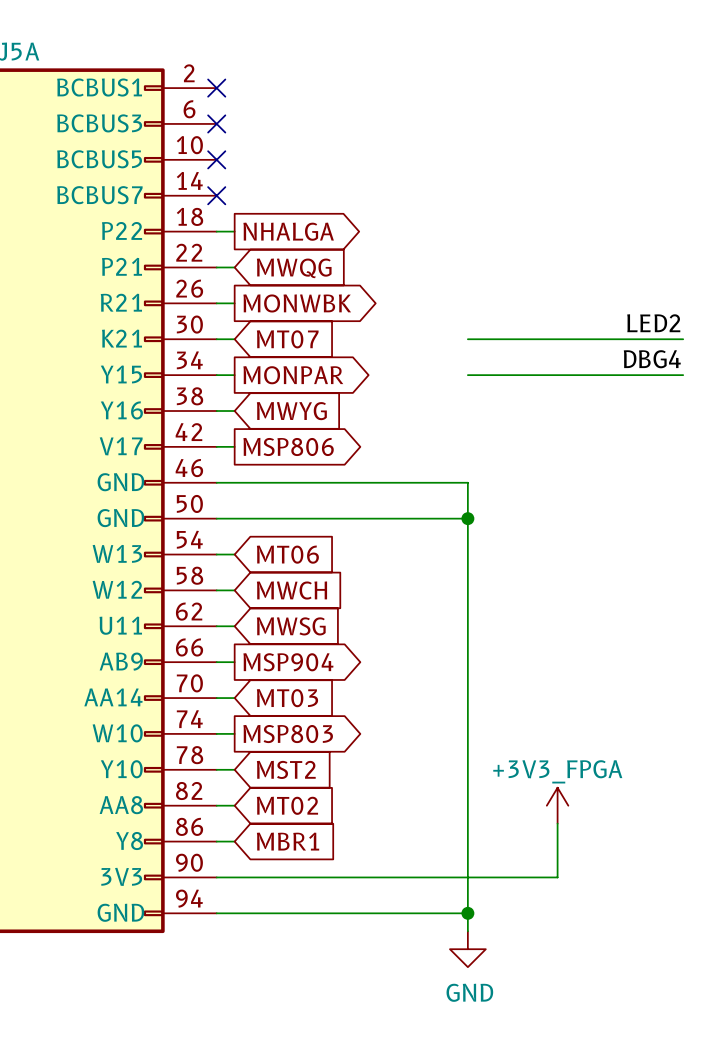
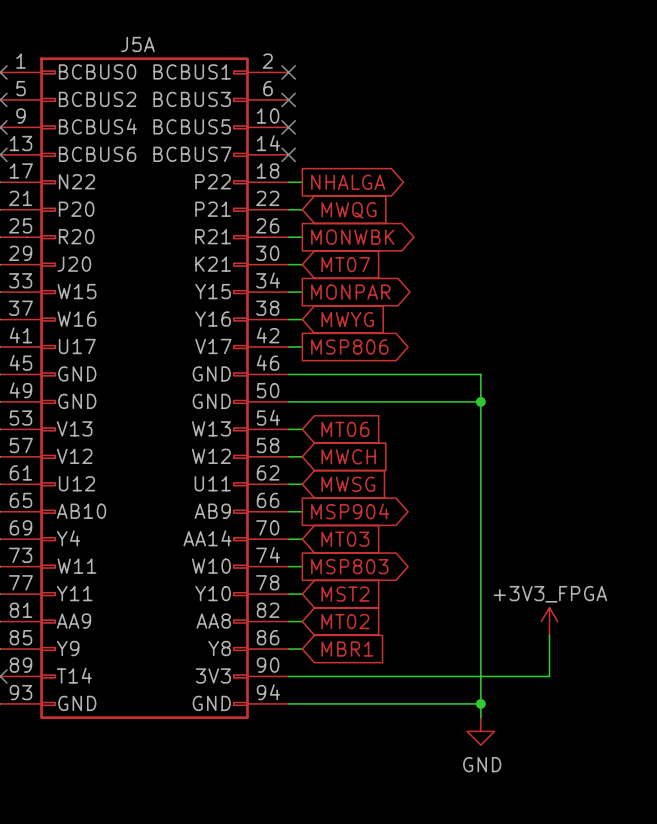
label: LED2 (653, 323) -> none
wire: (467, 339) (683, 339) -> none
label: DBG4 (652, 359) -> none
wire: (467, 375) (683, 375) -> none

